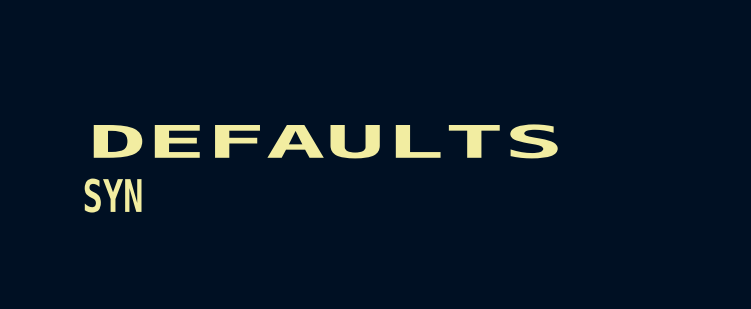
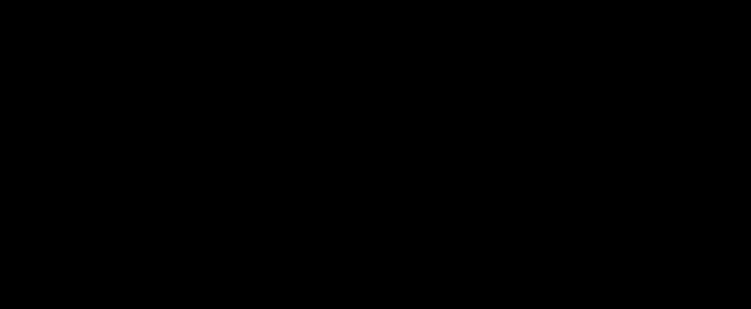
text: DEFAULTS (325, 141) -> none
text: SYN (113, 195) -> none

